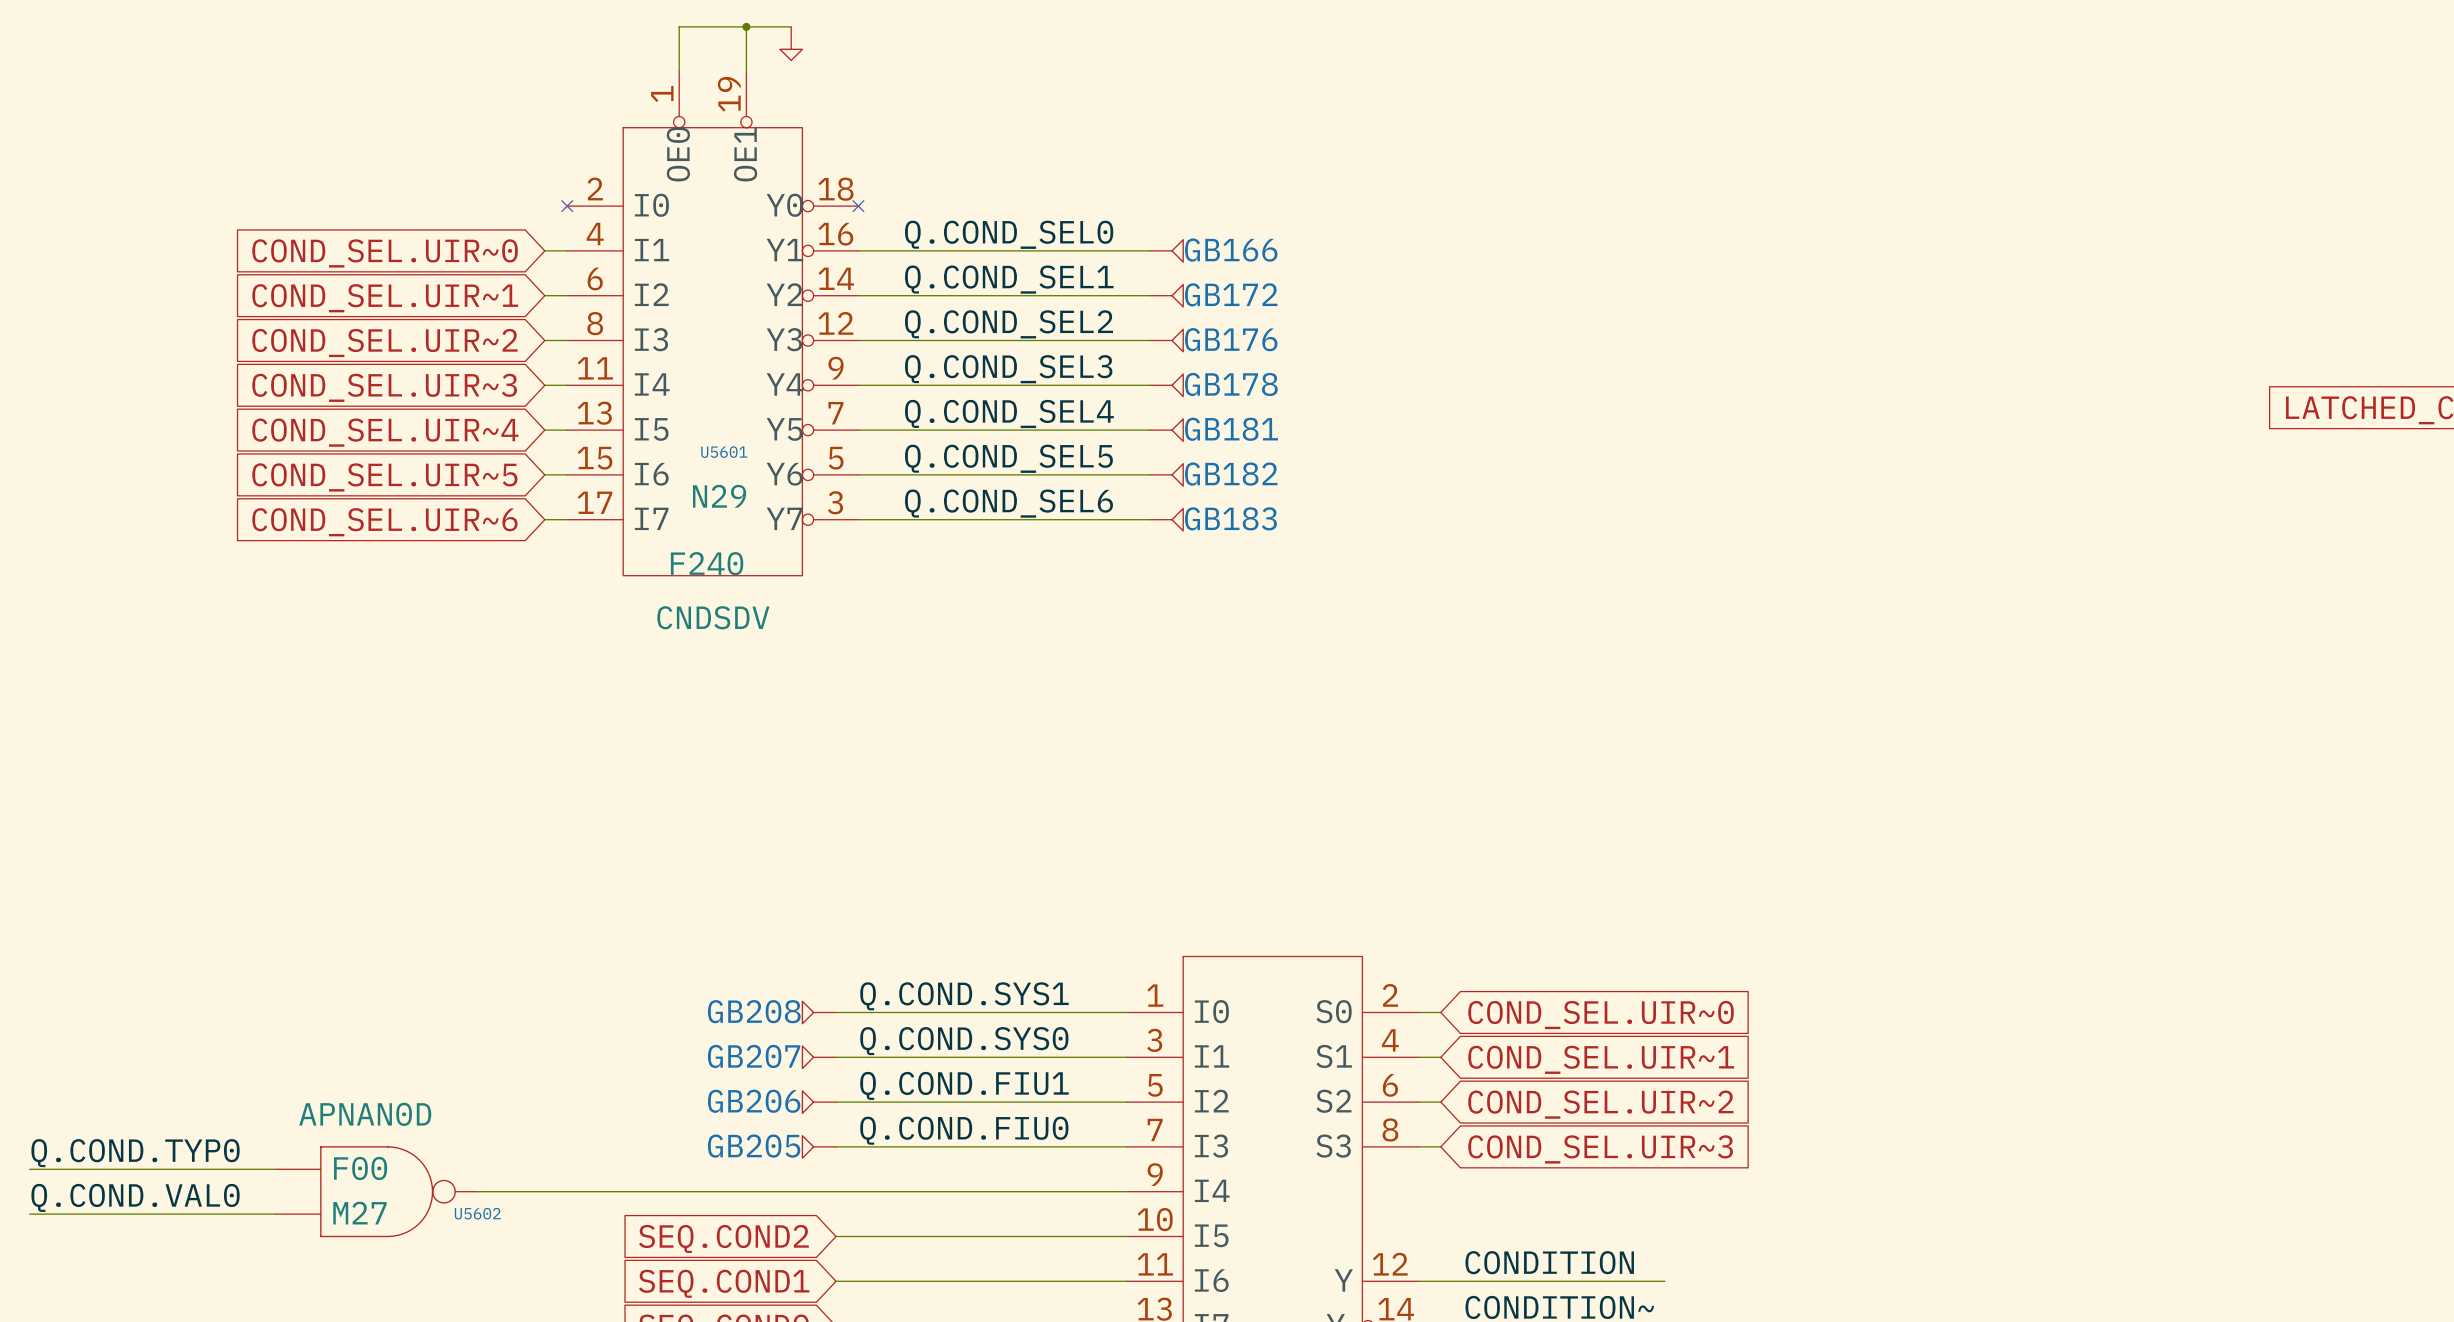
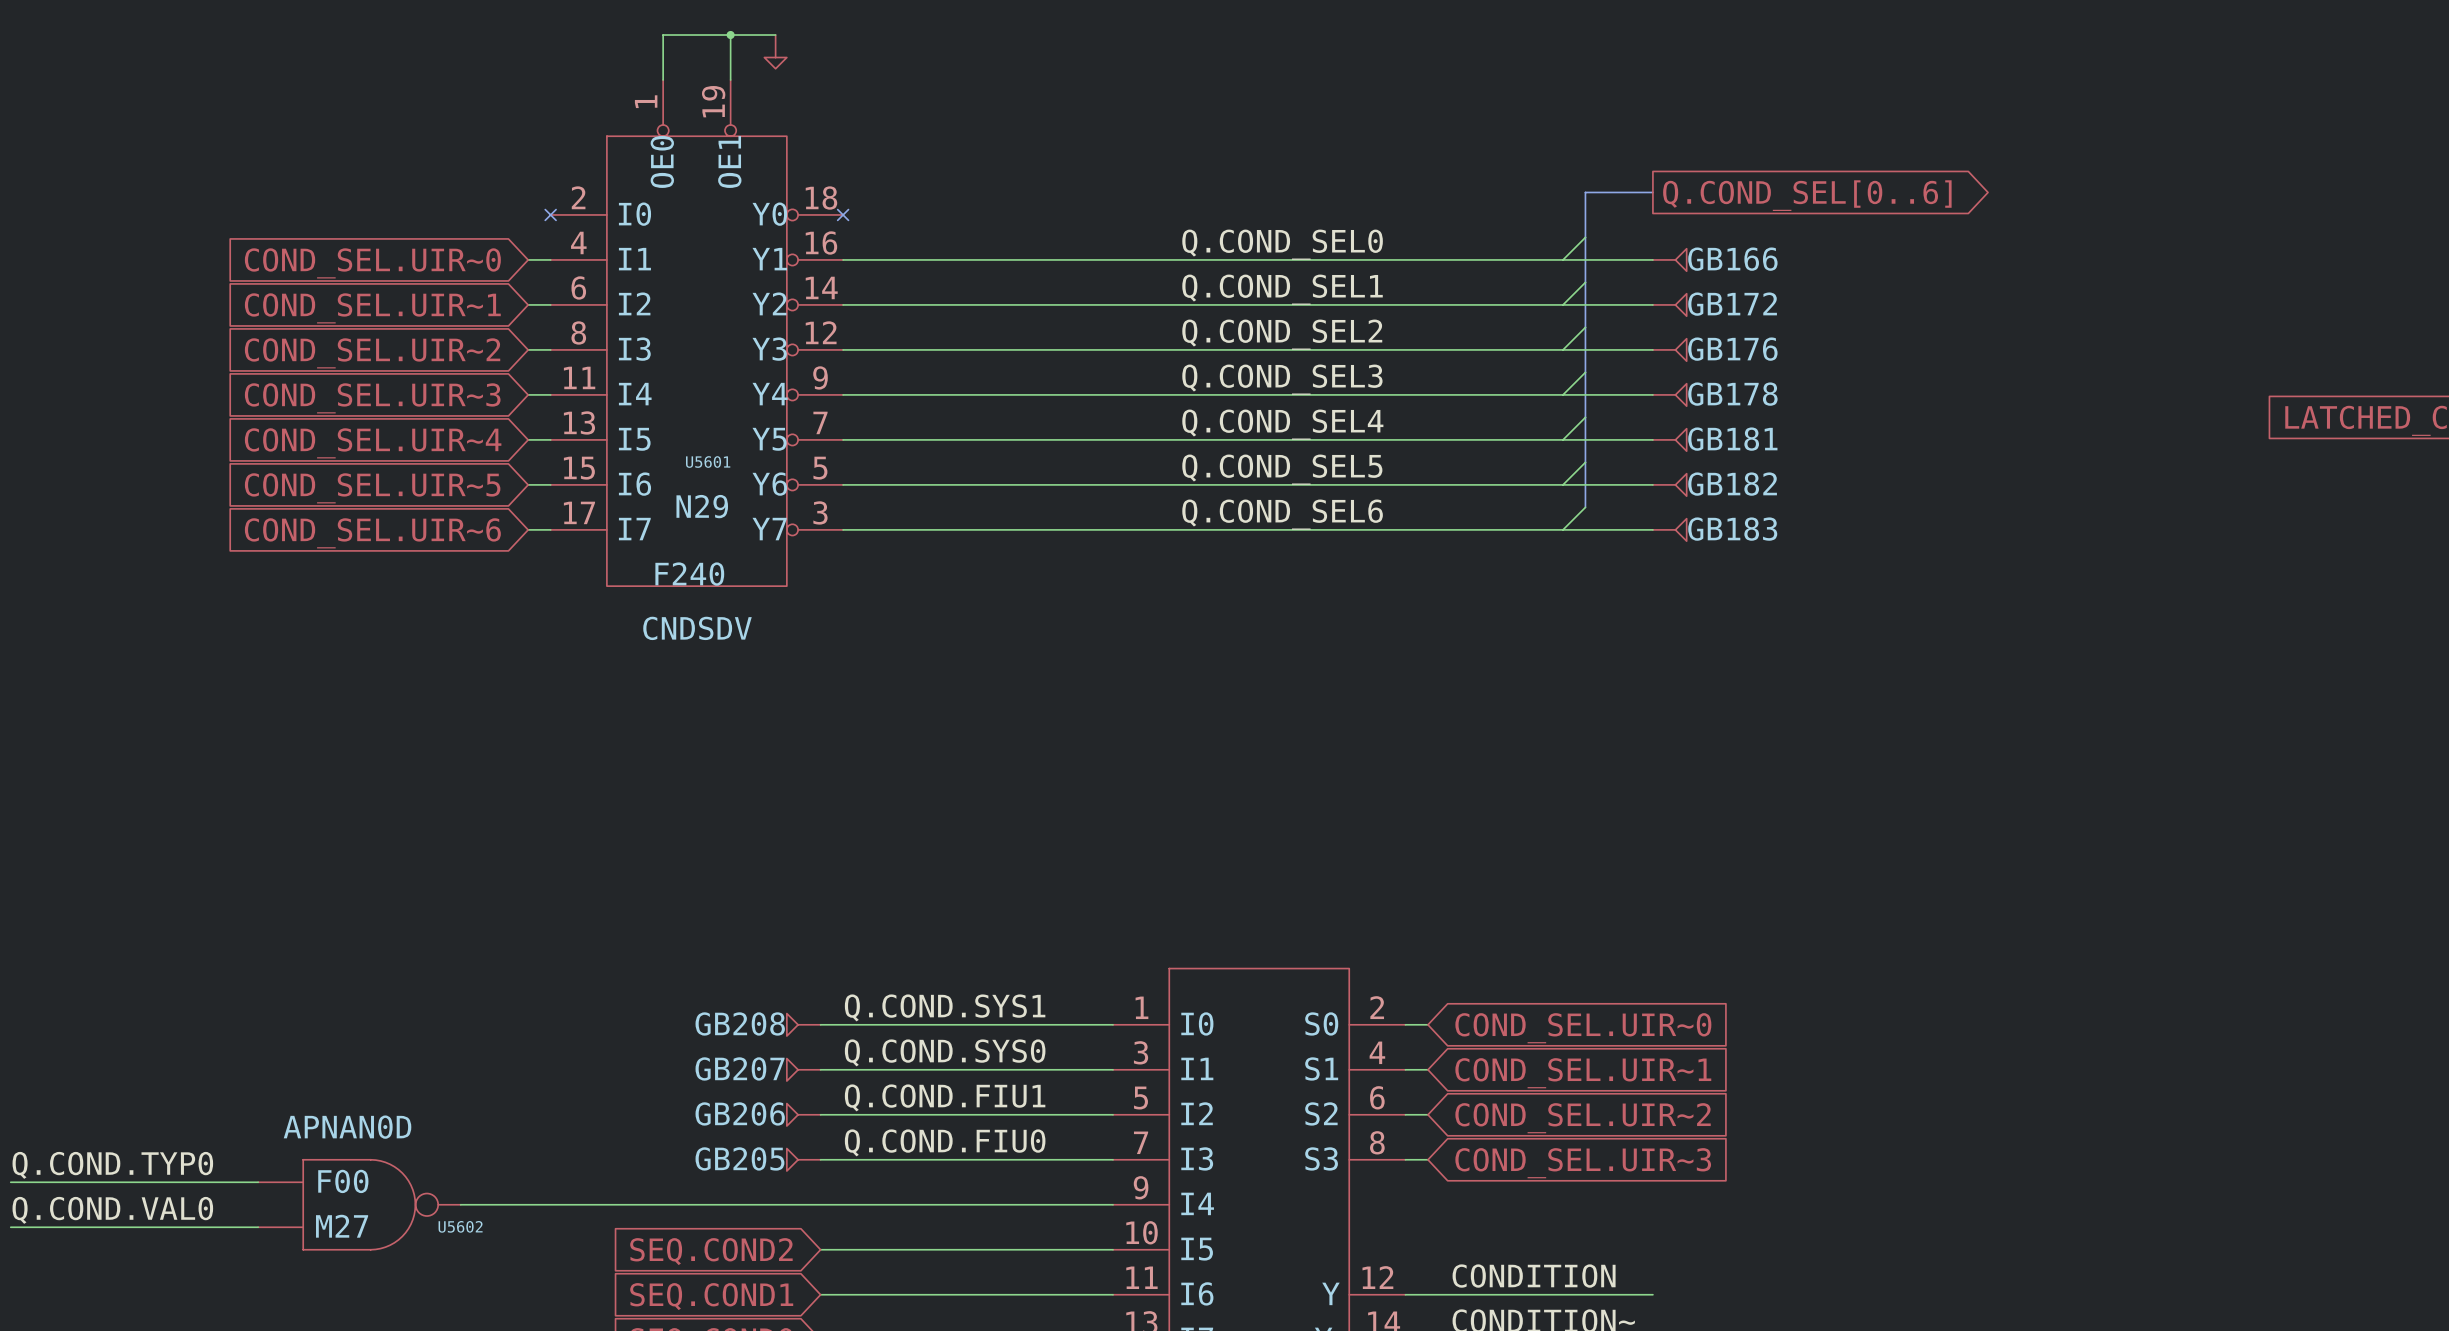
bus: none -> (1652, 192) (1585, 192) (1585, 507)
global label: none -> Q.COND_SEL[0..6] (1807, 195)
wire: none -> (1585, 237) (1562, 259)
label: Q.COND_SEL0 (1009, 234) -> none
label: none -> Q.COND_SEL0 (1282, 244)
wire: none -> (1135, 259) (1652, 259)
GB166 position: (1166, 250) -> (1670, 259)
wire: none -> (1585, 282) (1562, 304)
label: Q.COND_SEL1 (1009, 279) -> none
label: none -> Q.COND_SEL1 (1282, 289)
wire: none -> (1135, 304) (1652, 304)
GB172 position: (1166, 295) -> (1670, 304)
wire: none -> (1585, 327) (1562, 349)
label: Q.COND_SEL2 (1009, 324) -> none
label: none -> Q.COND_SEL2 (1282, 334)
wire: none -> (1135, 349) (1652, 349)
GB176 position: (1166, 340) -> (1670, 349)
wire: none -> (1585, 372) (1562, 394)
label: Q.COND_SEL3 (1008, 369) -> none
label: none -> Q.COND_SEL3 (1282, 379)
wire: none -> (1135, 394) (1652, 394)
GB178 position: (1166, 385) -> (1670, 394)
wire: none -> (1585, 417) (1562, 439)
label: Q.COND_SEL4 (1009, 413) -> none
label: none -> Q.COND_SEL4 (1282, 424)
wire: none -> (1135, 439) (1652, 439)
GB181 position: (1166, 430) -> (1670, 439)
wire: none -> (1585, 462) (1562, 484)
label: Q.COND_SEL5 (1008, 458) -> none
label: none -> Q.COND_SEL5 (1282, 469)
wire: none -> (1135, 484) (1652, 484)
GB182 position: (1166, 474) -> (1670, 484)
wire: none -> (1585, 507) (1562, 529)
label: Q.COND_SEL6 (1008, 503) -> none
label: none -> Q.COND_SEL6 (1282, 514)
wire: none -> (1135, 529) (1652, 529)
GB183 position: (1166, 519) -> (1670, 529)

